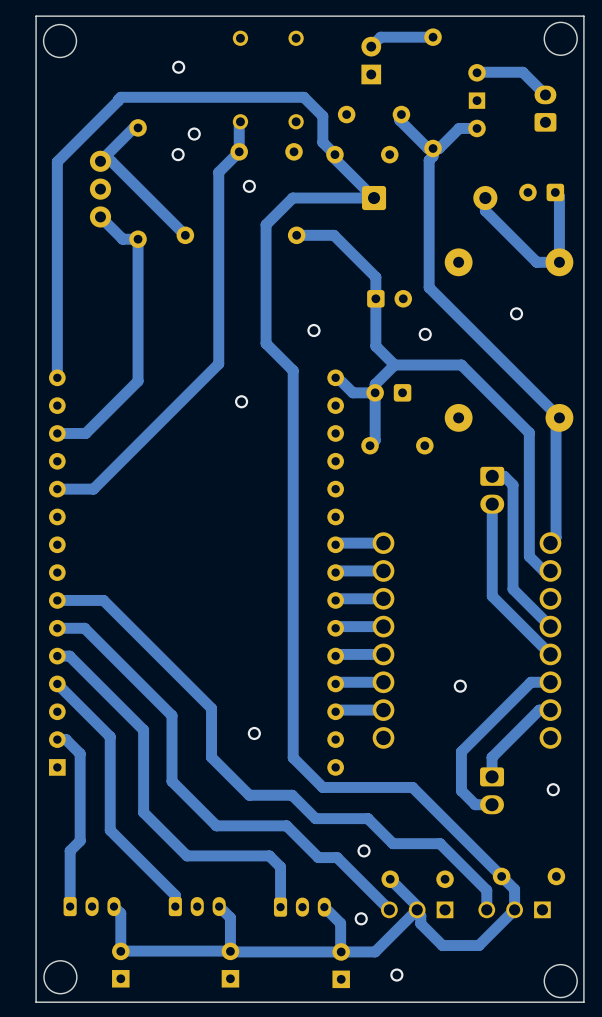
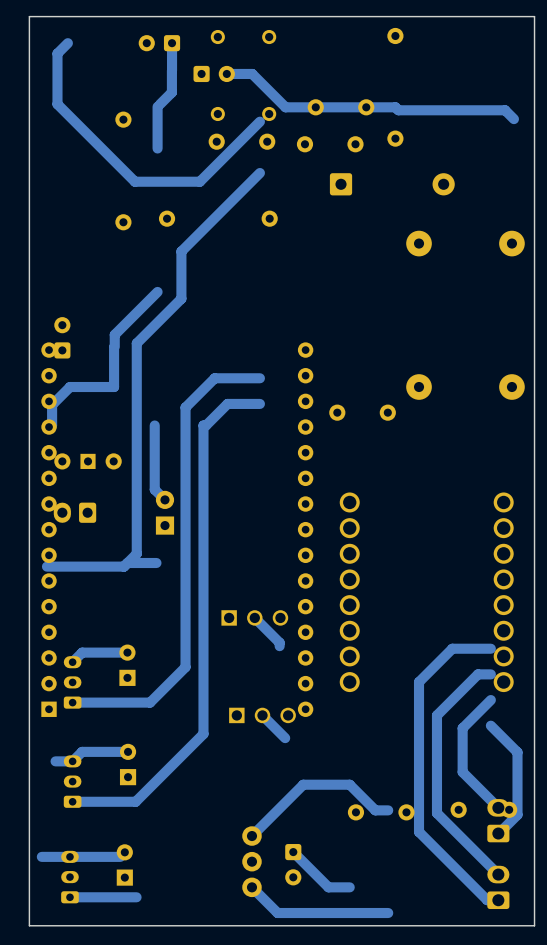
round board edge: [544, 22, 578, 56] -> none
round board edge: [43, 24, 77, 58] -> none
track: (428, 37) (380, 37) (371, 46) -> none
track: none -> (67, 43) (57, 53) (57, 104) (134, 181) (199, 181) (259, 121)
part: none -> (159, 43)
track: none -> (172, 43) (172, 70)
part: (371, 60) -> none
via: (178, 67) -> none
track: (477, 72) (522, 72) (545, 94) -> none
track: none -> (171, 70) (171, 92) (160, 104)
part: none -> (214, 73)
track: none -> (226, 73) (252, 73) (285, 107) (505, 110) (513, 119)
part: (477, 100) -> none
part: (545, 108) -> none
track: none -> (157, 106) (157, 148)
track: (399, 115) (399, 120) (428, 148) (439, 148) (459, 128) (477, 128) -> none
track: (240, 121) (239, 151) (218, 172) (218, 363) (93, 489) (57, 489) -> none
track: (138, 127) (133, 127) (100, 161) (111, 161) (185, 235) -> none
via: (194, 134) -> none
track: (433, 148) (433, 156) (429, 160) (429, 287) (559, 417) (556, 421) (556, 537) (550, 543) -> none
via: (178, 154) -> none
track: none -> (259, 173) (181, 251) (181, 298) (136, 343) (136, 553) (123, 566) (46, 566)
via: (249, 186) -> none
part: (100, 189) -> none
part: (541, 192) -> none
track: (555, 192) (559, 196) (559, 262) (536, 262) (485, 210) (485, 198) -> none
track: (100, 216) (122, 239) (138, 239) (138, 381) (85, 433) (57, 433) -> none
track: (296, 235) (333, 235) (375, 277) (375, 346) (394, 365) -> none
part: (389, 298) -> none
via: (516, 313) -> none
track: none -> (157, 291) (114, 334) (114, 346)
via: (313, 330) -> none
via: (425, 334) -> none
part: none -> (62, 337)
track: (394, 365) (461, 365) (529, 432) (529, 556) (543, 570) (550, 570) -> none
track: (394, 365) (375, 384) (375, 440) (370, 445) -> none
track: none -> (114, 347) (114, 387) (70, 387) (52, 404) (52, 425)
track: (57, 377) (57, 161) (120, 97) (303, 97) (322, 116) (322, 142) (334, 154) (334, 158) (374, 198) (292, 198) (266, 224) (266, 343) (293, 370) (293, 757) (322, 787) (412, 787) (514, 889) (514, 909) (478, 945) (442, 945) (420, 923) (420, 915) (417, 912) (417, 906) (390, 879) -> none
track: (341, 381) (352, 392) (375, 392) -> none
part: (388, 392) -> none
via: (241, 401) -> none
track: none -> (259, 378) (214, 378) (185, 407) (185, 667) (150, 702) (72, 702)
track: none -> (259, 403) (227, 403) (206, 425) (203, 425) (203, 734) (135, 801) (72, 801)
track: none -> (154, 425) (154, 489) (164, 499)
track: (492, 476) (504, 476) (513, 485) (513, 589) (550, 626) -> none
part: (492, 490) -> none
part: none -> (88, 461)
track: (492, 504) (492, 596) (550, 654) -> none
track: (383, 543) (337, 543) (335, 544) -> none
part: none -> (74, 512)
part: none -> (164, 512)
track: (383, 570) (337, 570) (335, 572) -> none
track: (383, 598) (337, 598) (335, 600) -> none
track: (57, 600) (103, 600) (211, 708) (211, 757) (249, 795) (292, 795) (315, 818) (367, 818) (392, 843) (440, 843) (486, 890) (486, 909) -> none
track: none -> (156, 563) (127, 563)
track: (383, 626) (337, 626) (335, 628) -> none
track: (57, 628) (84, 628) (172, 715) (172, 781) (216, 825) (286, 825) (318, 857) (337, 857) (389, 909) -> none
track: (383, 654) (337, 654) (335, 656) -> none
track: (57, 656) (69, 656) (143, 730) (143, 812) (187, 855) (269, 855) (280, 867) (280, 907) -> none
track: none -> (254, 617) (279, 642) (279, 646)
part: none -> (254, 617)
track: (383, 682) (337, 682) (335, 683) -> none
track: (550, 682) (531, 682) (461, 751) (461, 790) (475, 804) (492, 804) -> none
track: (57, 683) (110, 736) (110, 830) (175, 895) (175, 906) -> none
via: (460, 686) -> none
track: none -> (490, 648) (452, 648) (419, 682) (419, 831) (487, 900) (498, 900)
track: none -> (127, 652) (82, 652) (72, 662)
track: (383, 710) (337, 710) (335, 711) -> none
track: (550, 710) (539, 710) (492, 757) (492, 776) -> none
part: none -> (127, 665)
track: none -> (490, 674) (478, 674) (436, 715) (436, 813) (498, 874)
via: (254, 733) -> none
part: none -> (72, 682)
track: (57, 739) (65, 739) (80, 753) (80, 840) (70, 850) (70, 906) -> none
track: none -> (490, 700) (462, 728) (462, 772) (498, 807)
track: none -> (262, 715) (285, 738)
part: none -> (262, 715)
track: none -> (490, 725) (517, 752) (517, 814) (498, 833)
via: (553, 789) -> none
part: (492, 790) -> none
track: none -> (128, 751) (82, 751) (72, 761) (55, 761)
part: none -> (128, 764)
part: none -> (72, 781)
via: (364, 850) -> none
track: none -> (388, 810) (375, 810) (349, 784) (303, 784) (251, 836)
part: none -> (498, 820)
part: (92, 906) -> none
track: (113, 906) (120, 913) (120, 951) (231, 950) -> none
part: (197, 906) -> none
track: (219, 906) (230, 917) (230, 951) -> none
part: (302, 907) -> none
track: (324, 907) (340, 923) (341, 951) -> none
track: (417, 909) (375, 951) (229, 951) -> none
part: (417, 909) -> none
part: (514, 909) -> none
via: (361, 918) -> none
track: none -> (293, 852) (328, 887) (349, 887)
track: none -> (120, 856) (41, 856)
part: none -> (251, 861)
part: none -> (293, 864)
part: none -> (69, 877)
round board edge: [43, 960, 78, 994] -> none
track: none -> (251, 887) (277, 913) (388, 913)
part: none -> (498, 887)
round board edge: [544, 964, 578, 998] -> none
part position: (120, 965) -> (124, 864)
part: (230, 965) -> none
part: (341, 965) -> none
track: none -> (136, 897) (69, 897)
via: (396, 975) -> none

